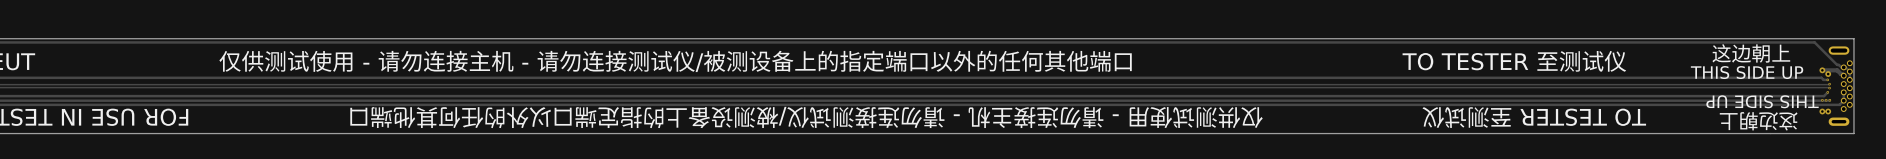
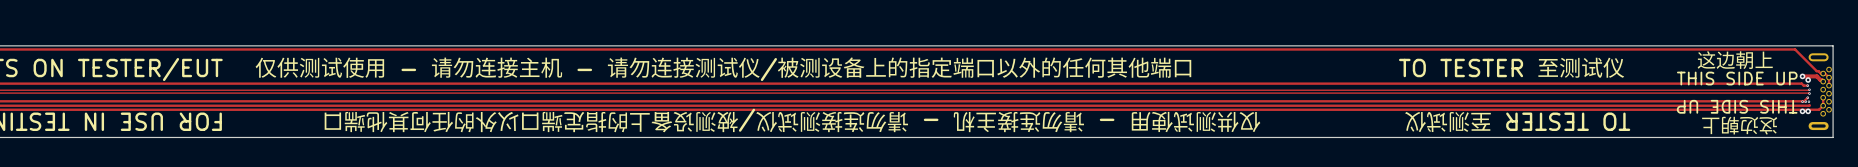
via: none -> (1802, 101)
via: none -> (1805, 101)
via: none -> (1808, 101)
via: (1822, 100) -> none
via: (1826, 100) -> none
via: (1829, 100) -> none
via: none -> (1802, 111)
via: none -> (1808, 111)
via: (1822, 111) -> none
via: (1828, 111) -> none

